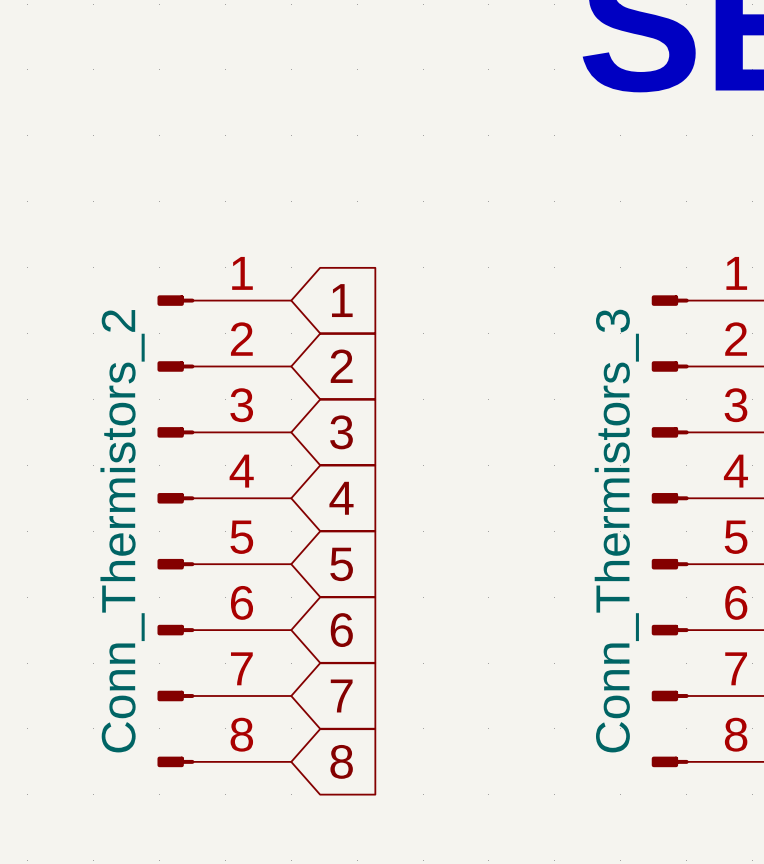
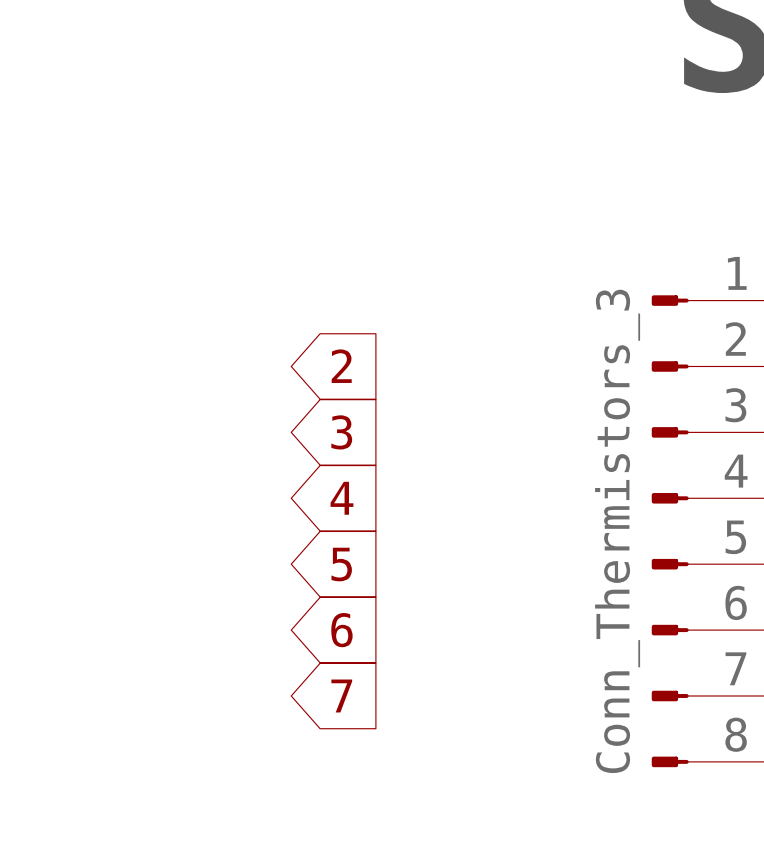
global label: 1 (342, 300) -> none
Conn_Thermistors_2: (224, 531) -> none
global label: 8 (341, 761) -> none

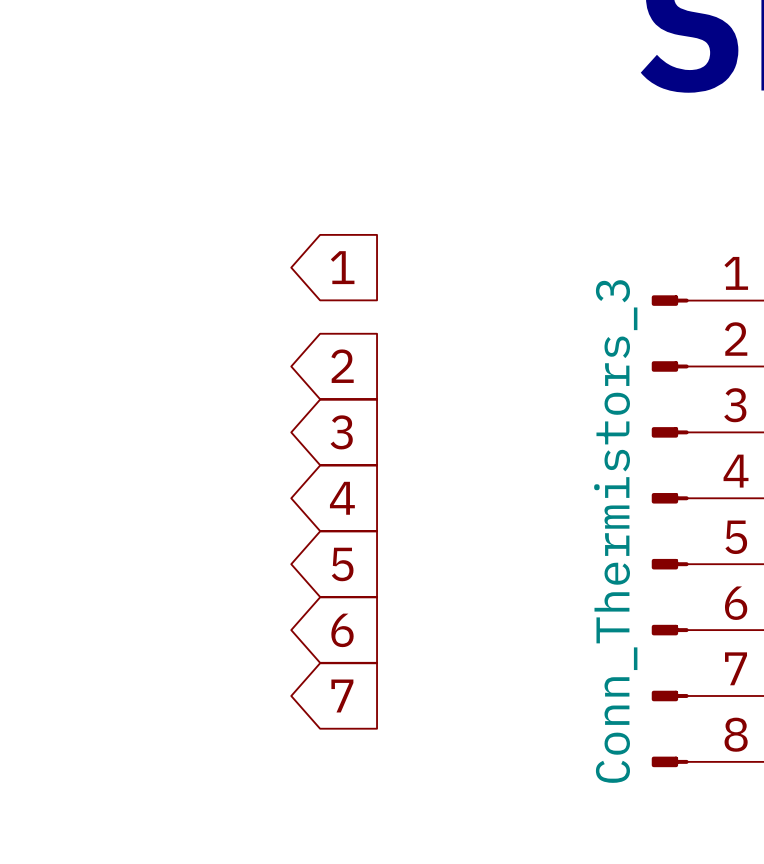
global label: none -> 1 (342, 267)

